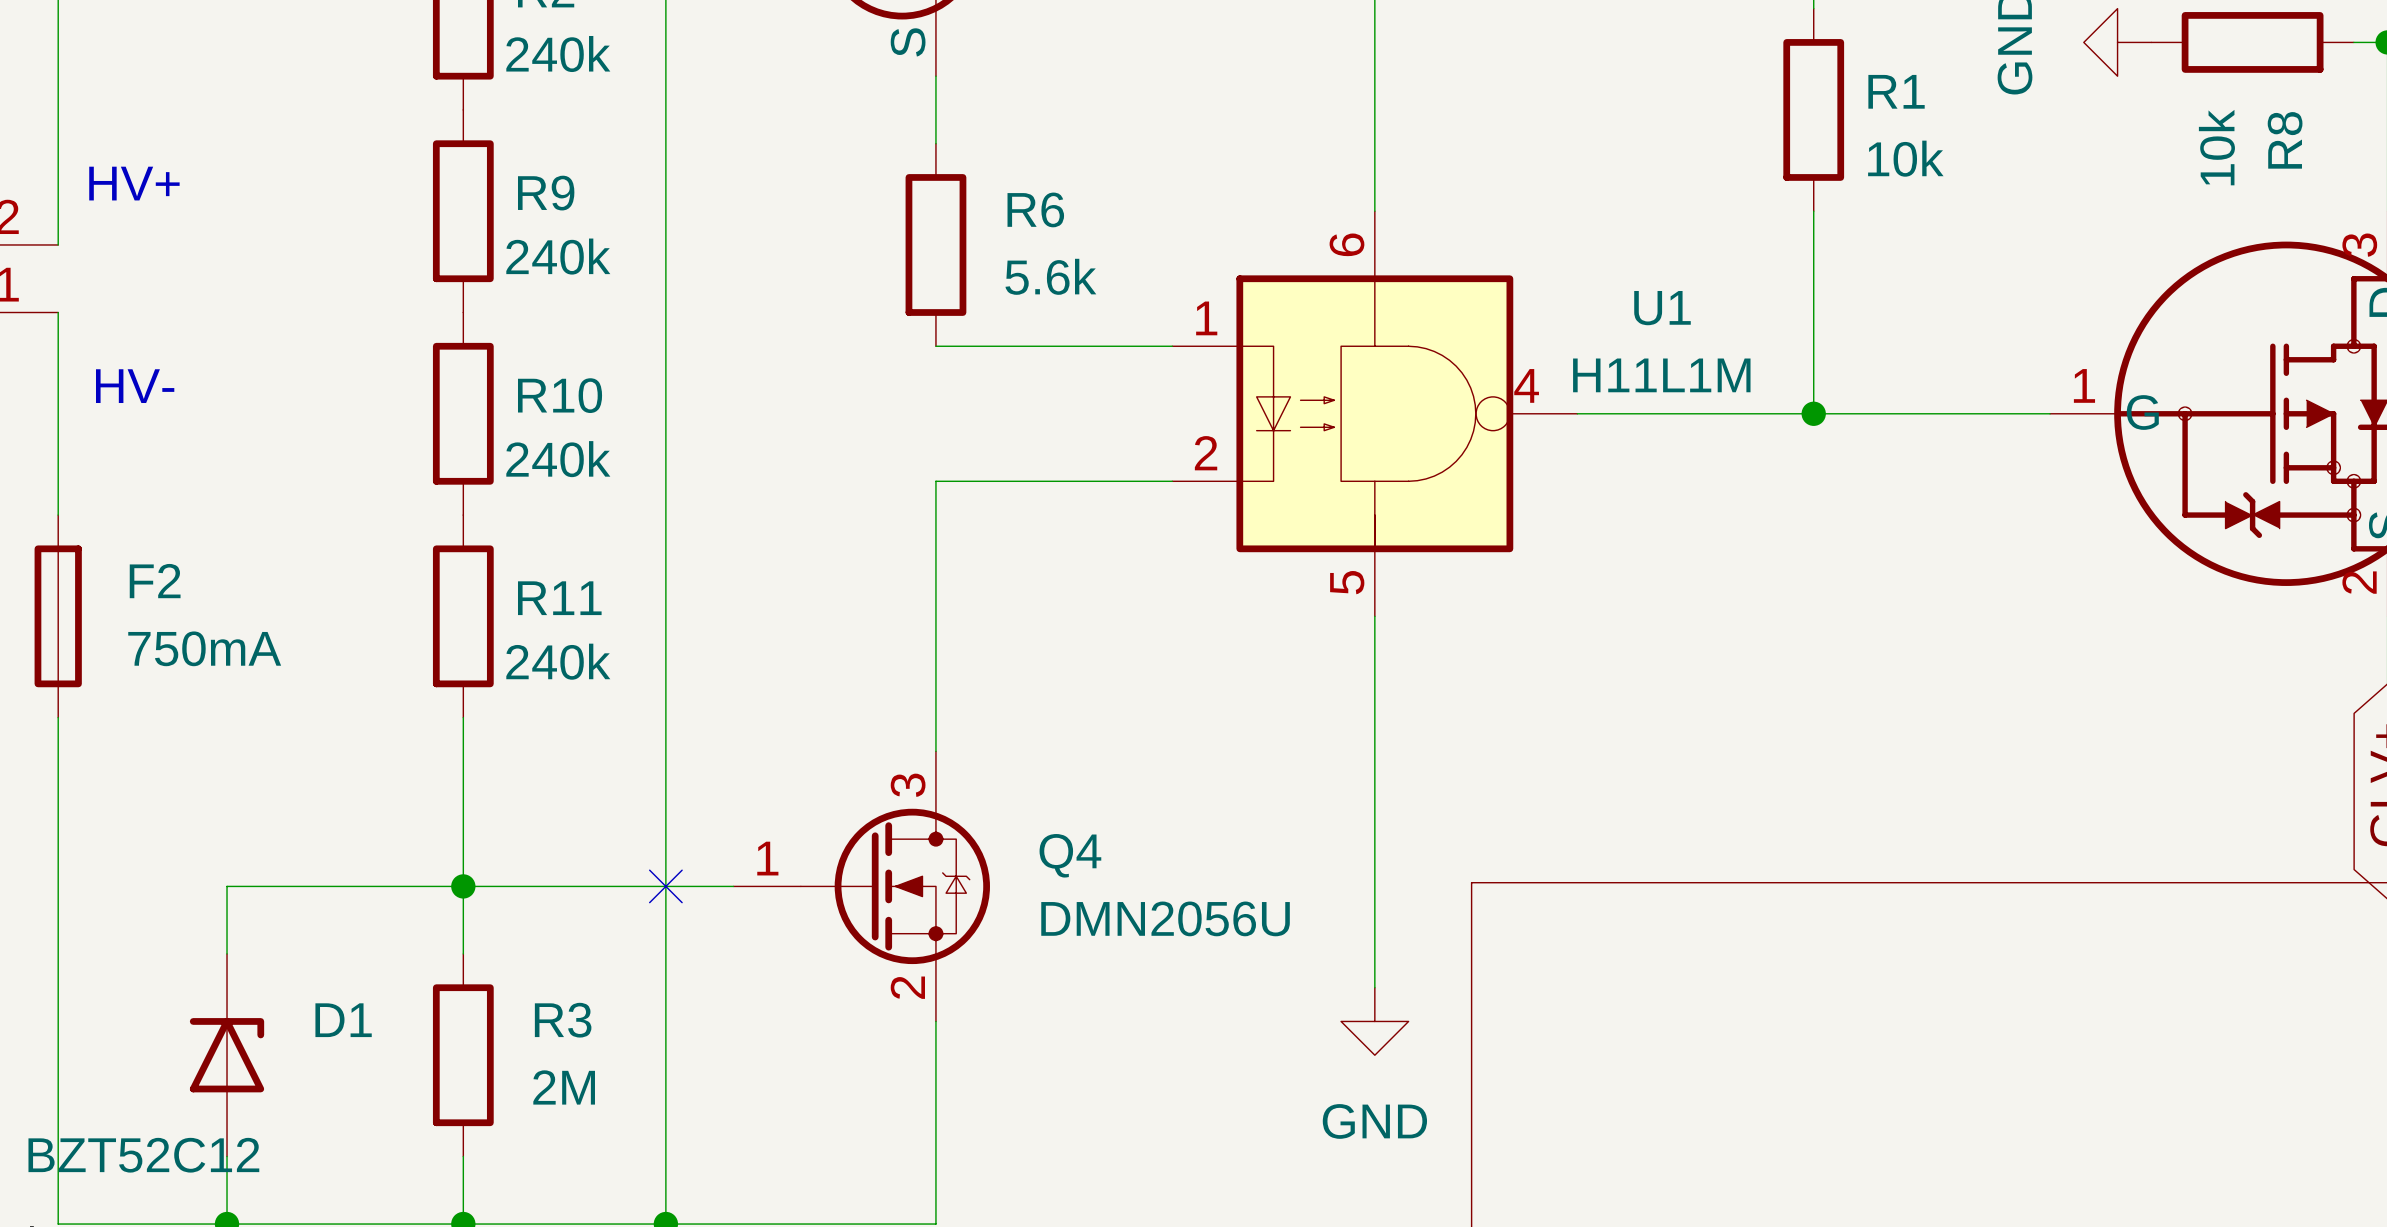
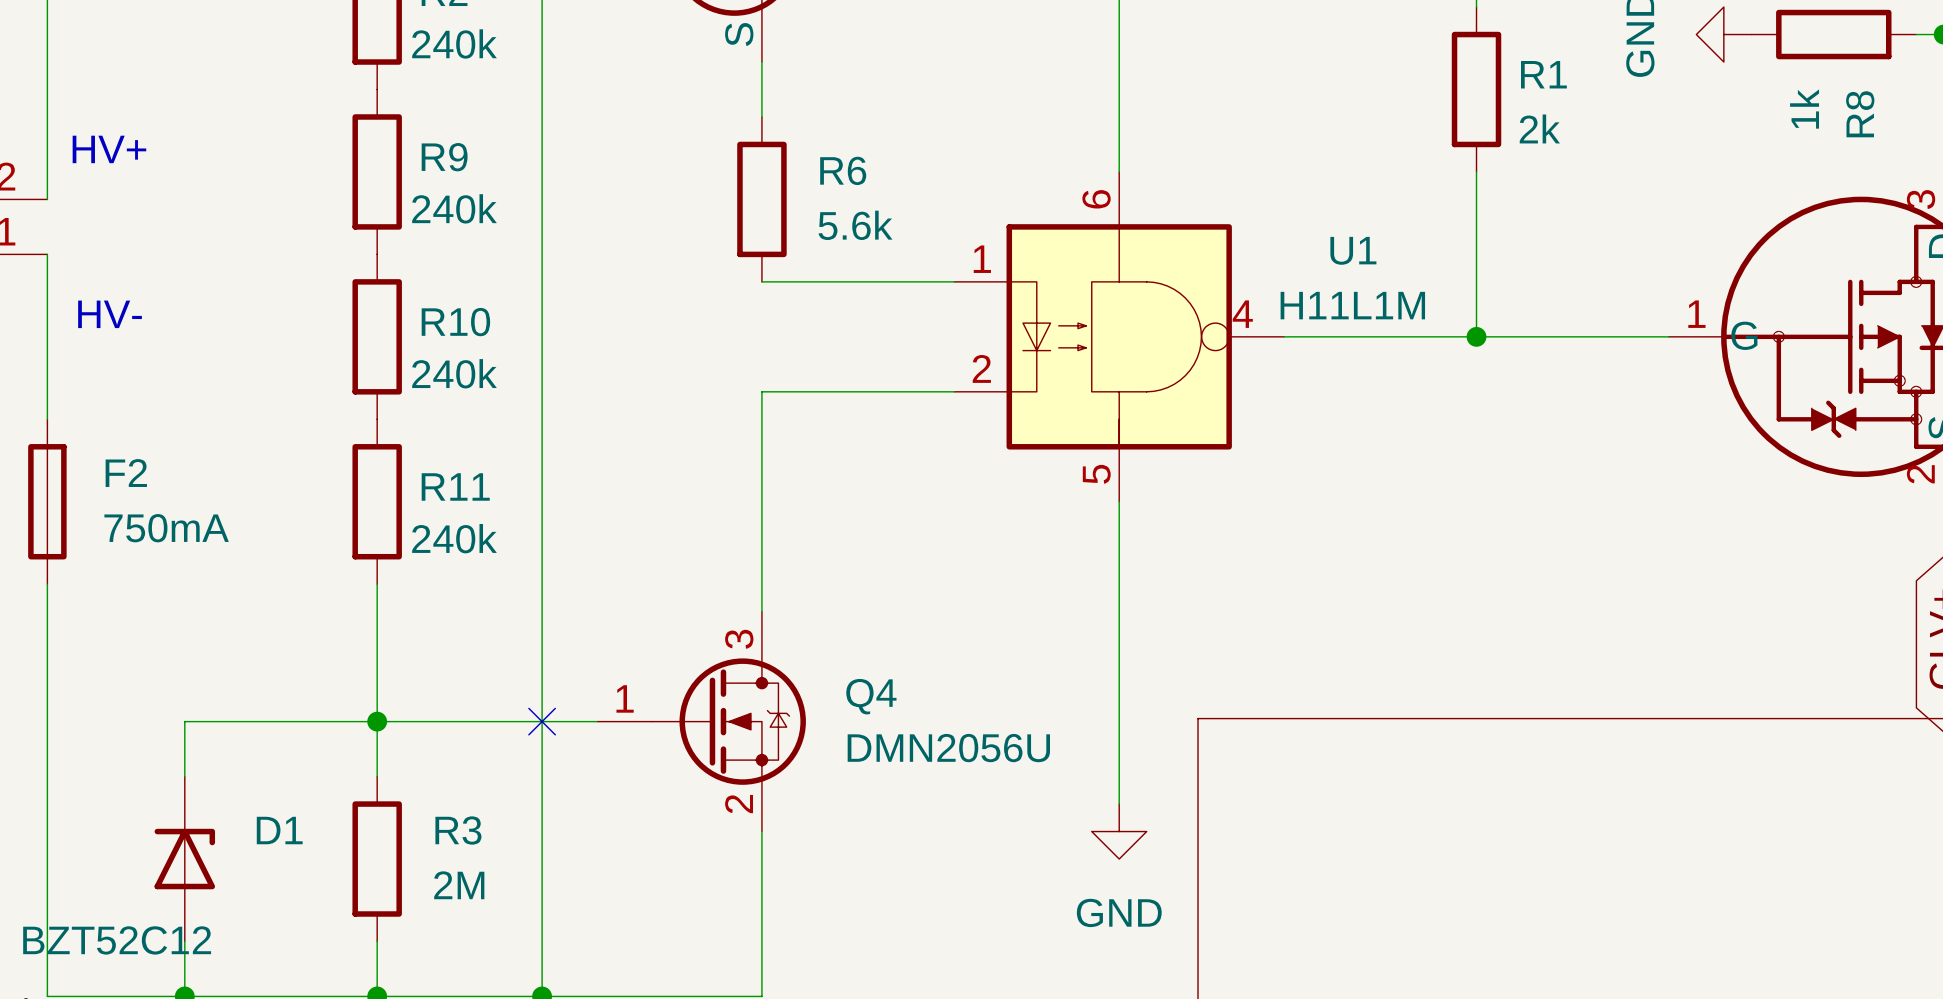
R8 value: 10k (2216, 147) -> 1k (1804, 109)
R1 value: 10k (1905, 158) -> 2k (1539, 128)

